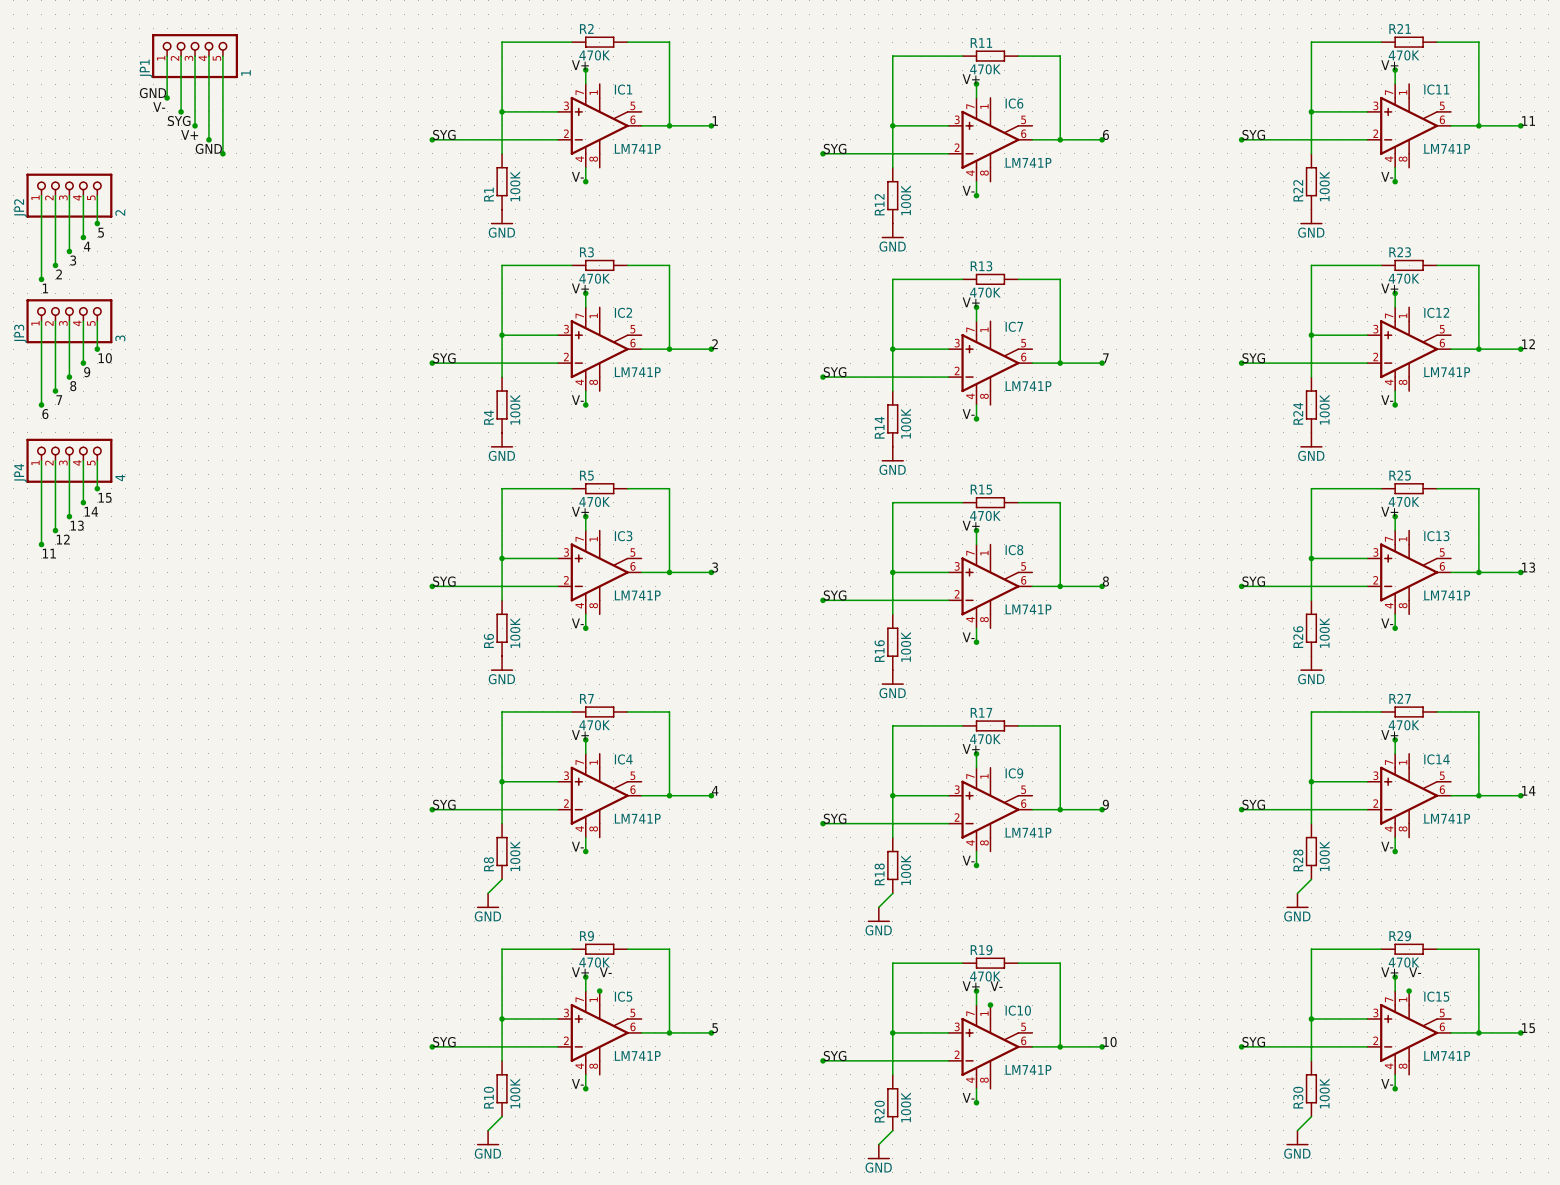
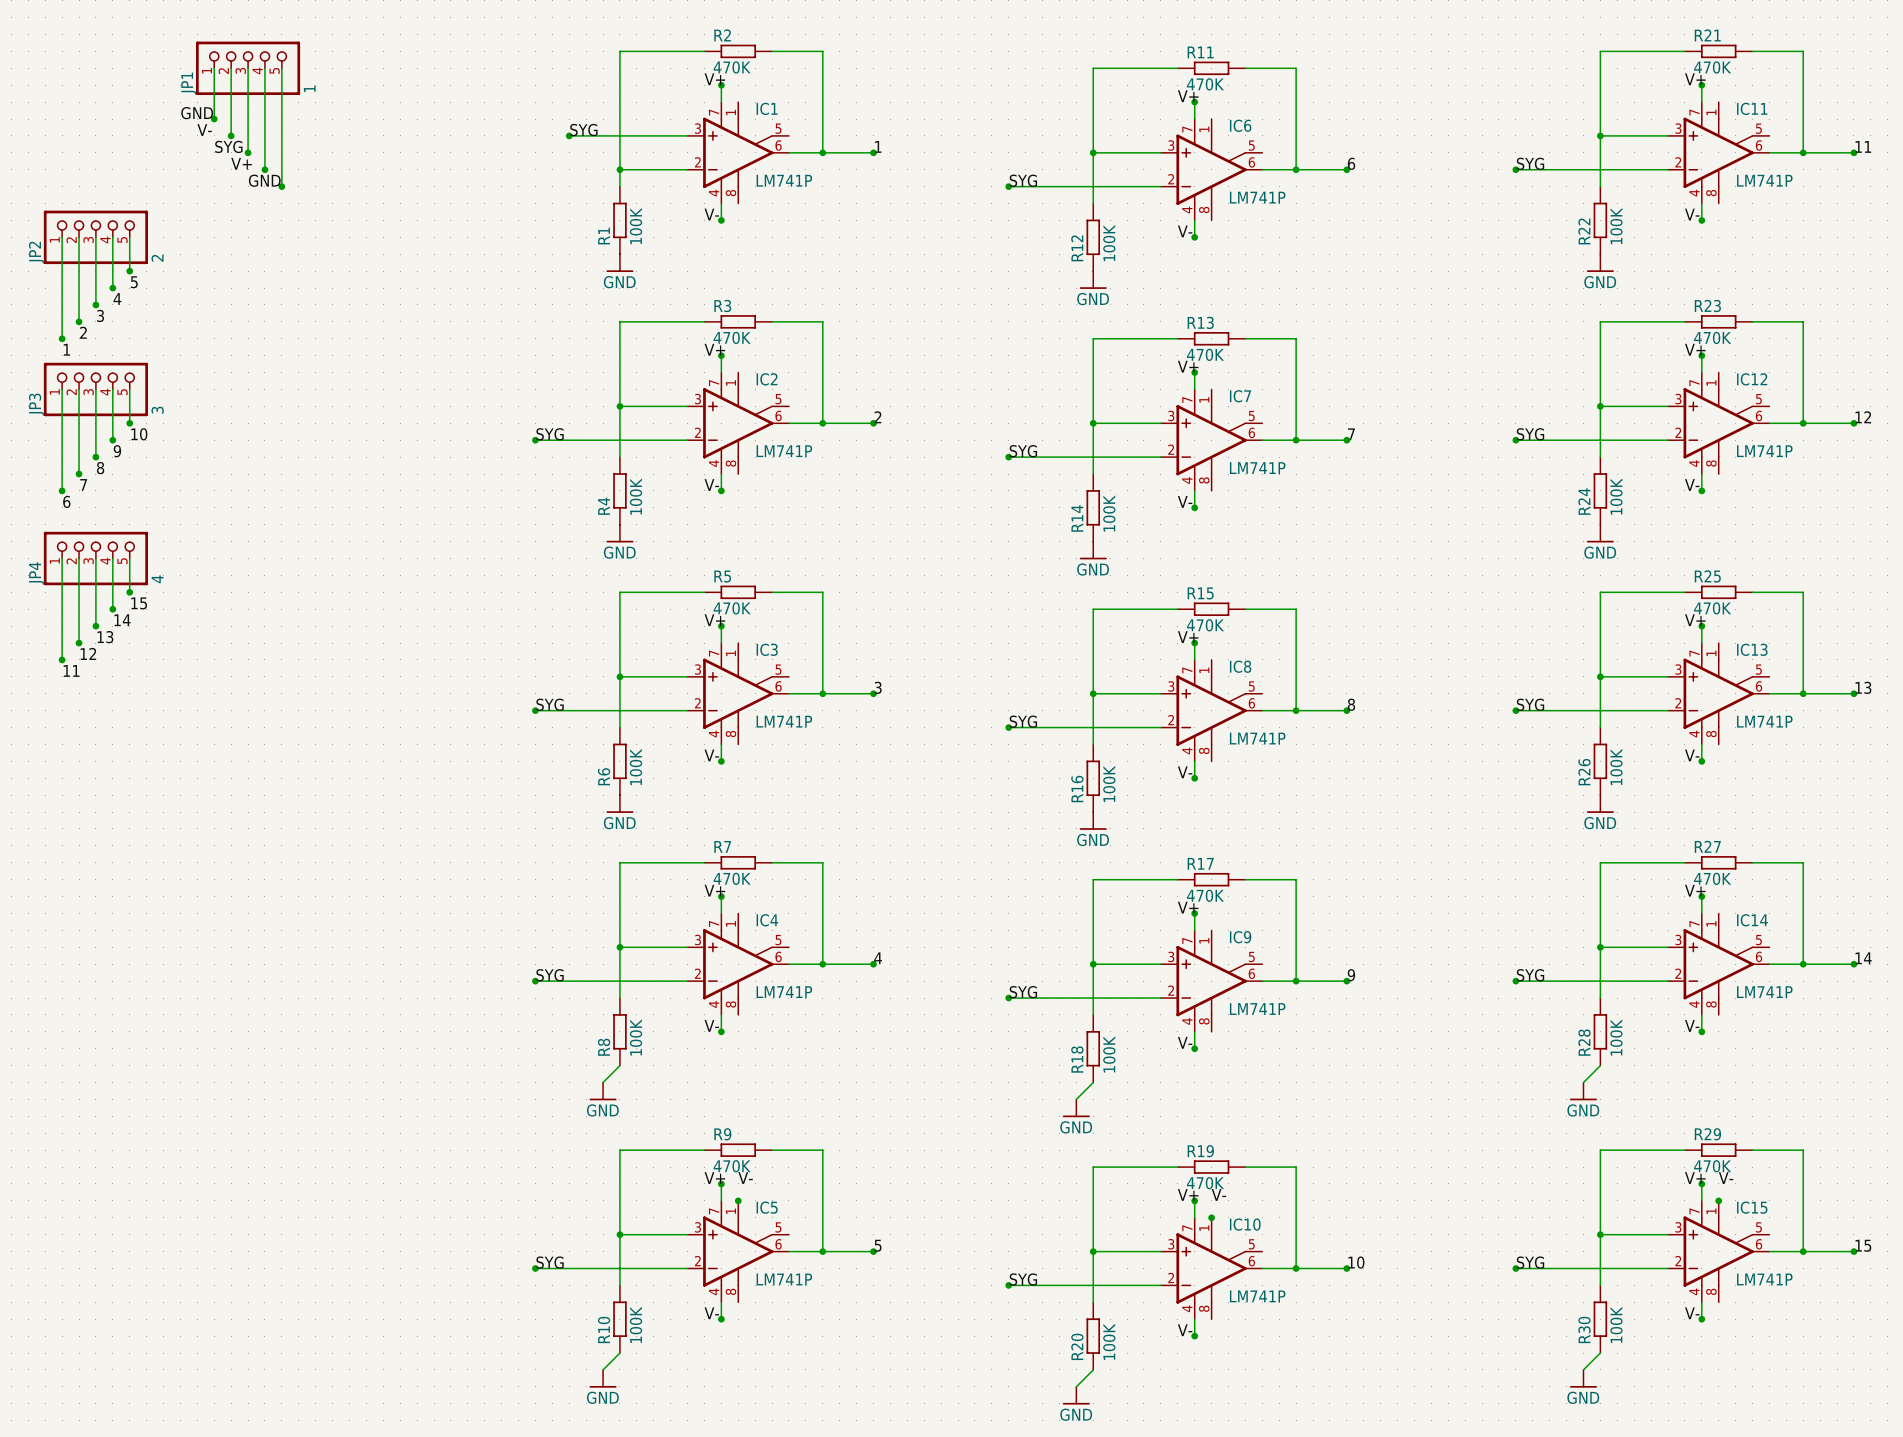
wire: none -> (569, 135) (619, 135)
junction: none -> (569, 135)
junction: (502, 111) -> none
label position: SYG (444, 134) -> SYG (583, 130)
wire: (432, 139) (502, 139) -> none
junction: (432, 139) -> none
junction: none -> (619, 169)

